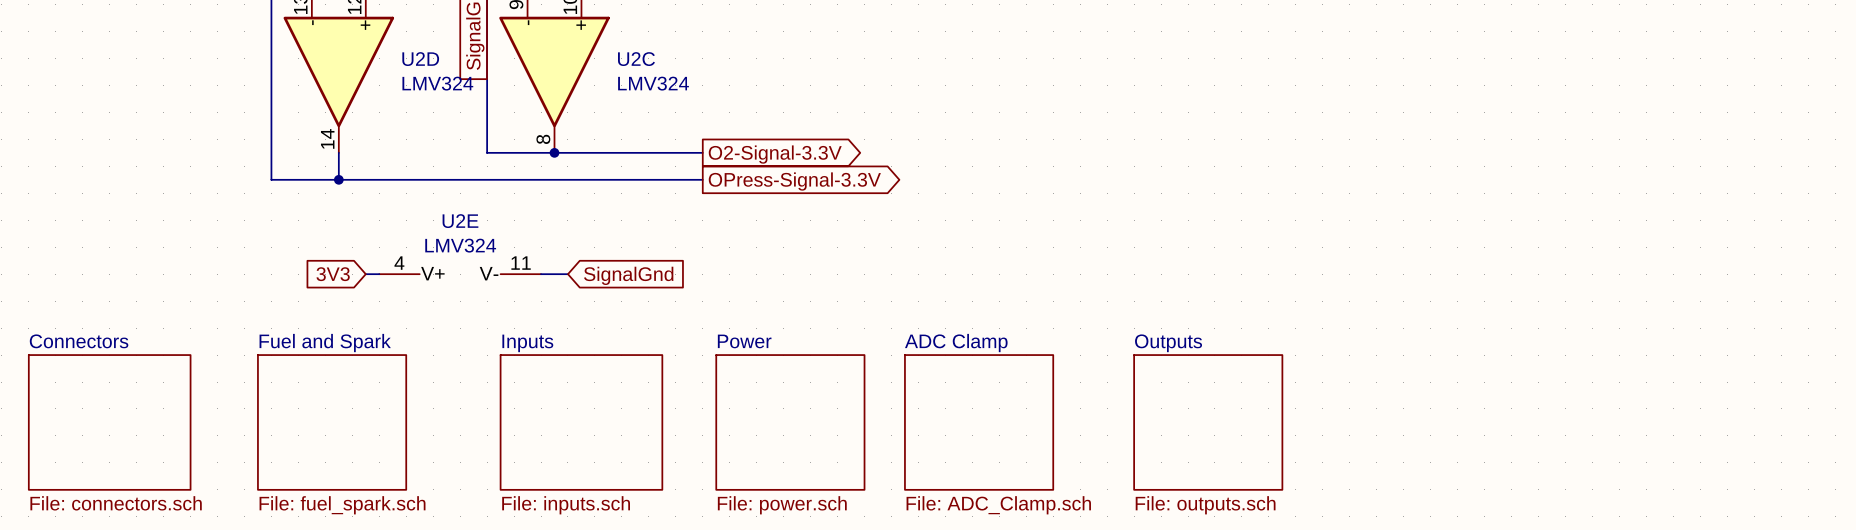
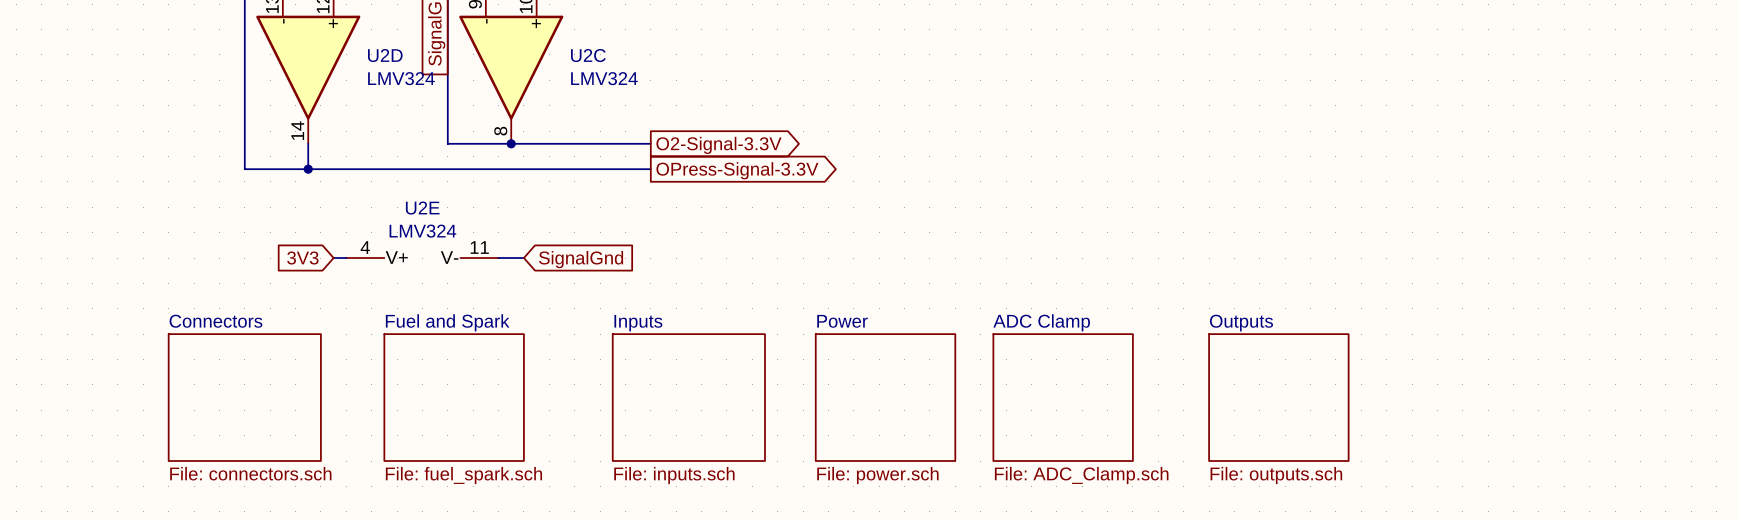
sheet Connectors position: (109, 422) -> (244, 397)
sheet Fuel and Spark position: (332, 422) -> (454, 397)
sheet Inputs position: (581, 422) -> (688, 397)
sheet Power position: (790, 422) -> (885, 397)
sheet ADC Clamp position: (979, 422) -> (1063, 397)
sheet Outputs position: (1208, 422) -> (1278, 397)

